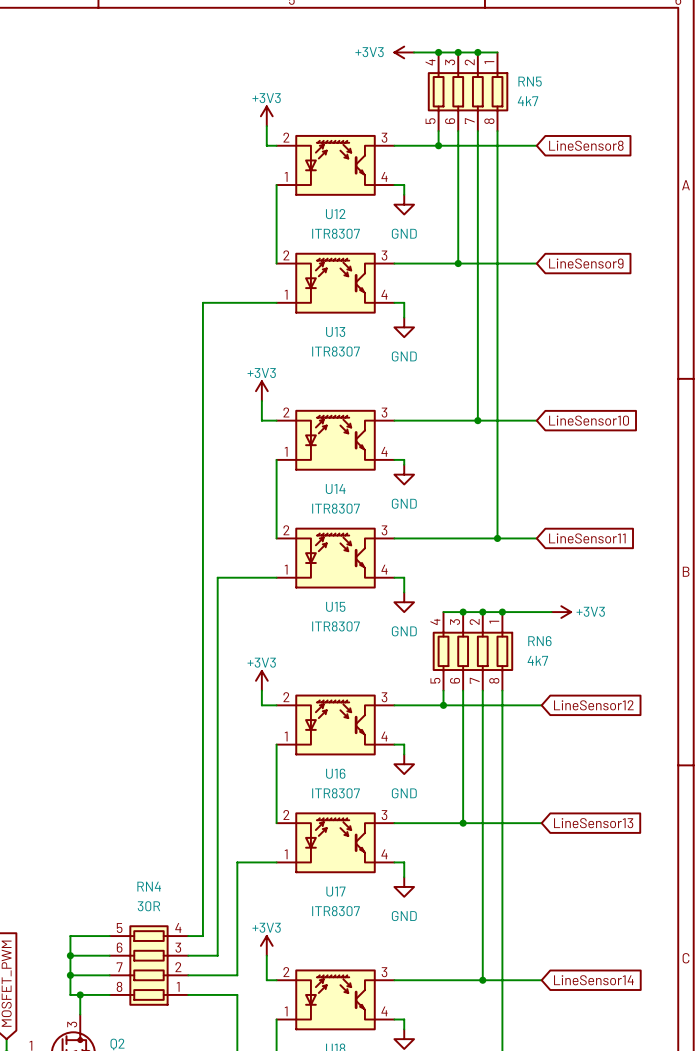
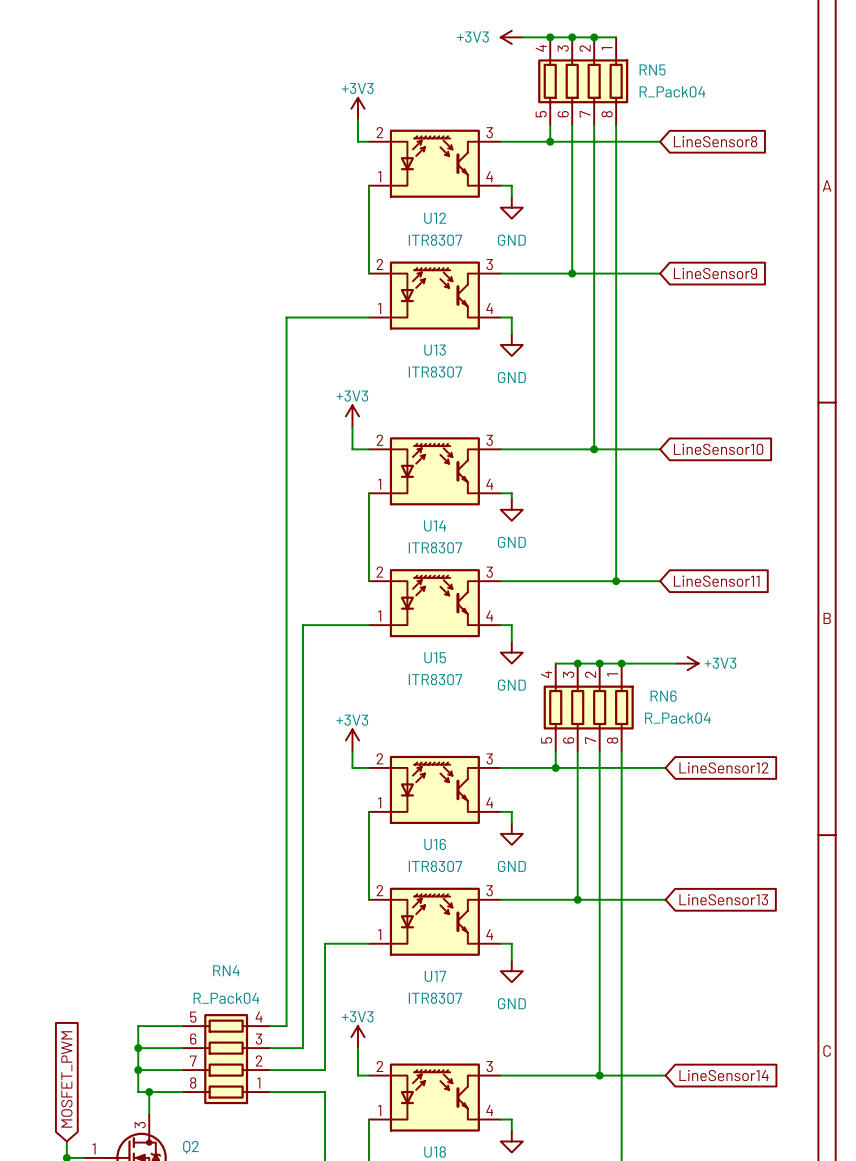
RN5 value: 4k7 (528, 101) -> R_Pack04 (672, 91)
RN6 value: 4k7 (537, 660) -> R_Pack04 (677, 718)
RN4 value: 30R (148, 906) -> R_Pack04 (226, 998)

